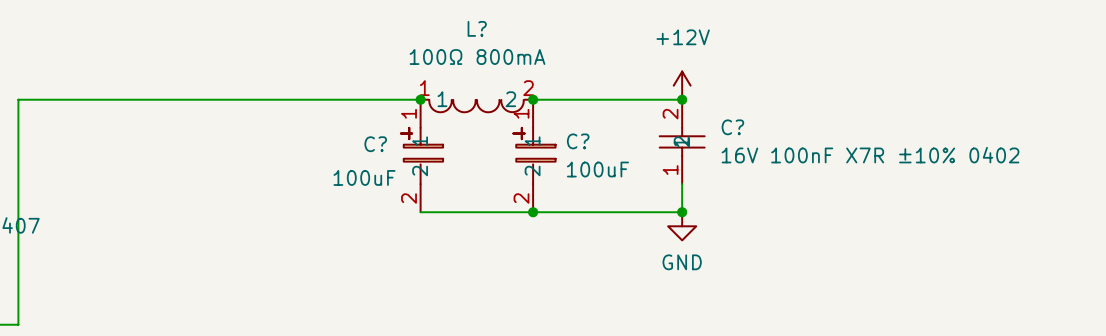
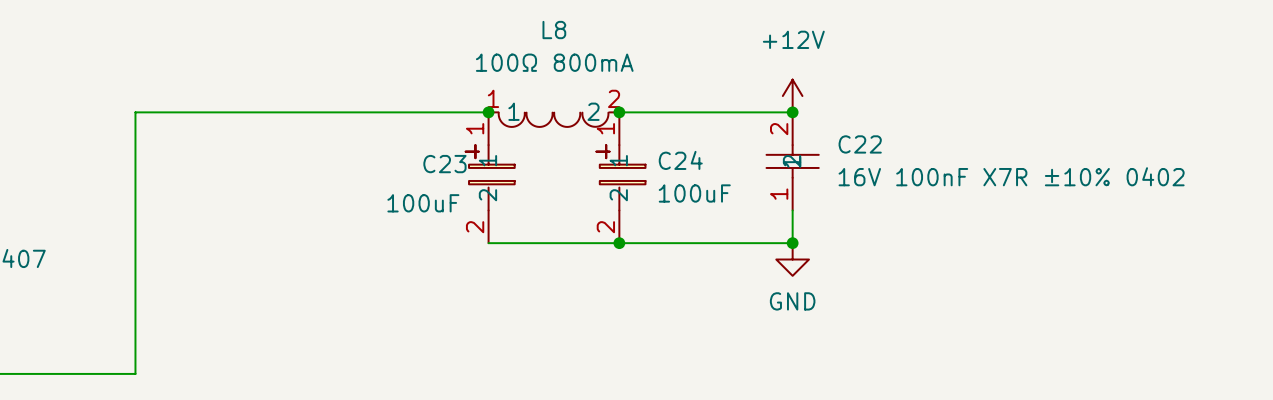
L? name: L? (477, 28) -> L8 (554, 30)
wire: (116, 99) (18, 99) (18, 324) -> (135, 112) (135, 373) (21, 373)
C? name: C? (732, 127) -> C22 (860, 144)
C? name: C? (578, 141) -> C24 (680, 160)
C? name: C? (375, 144) -> C23 (444, 164)

